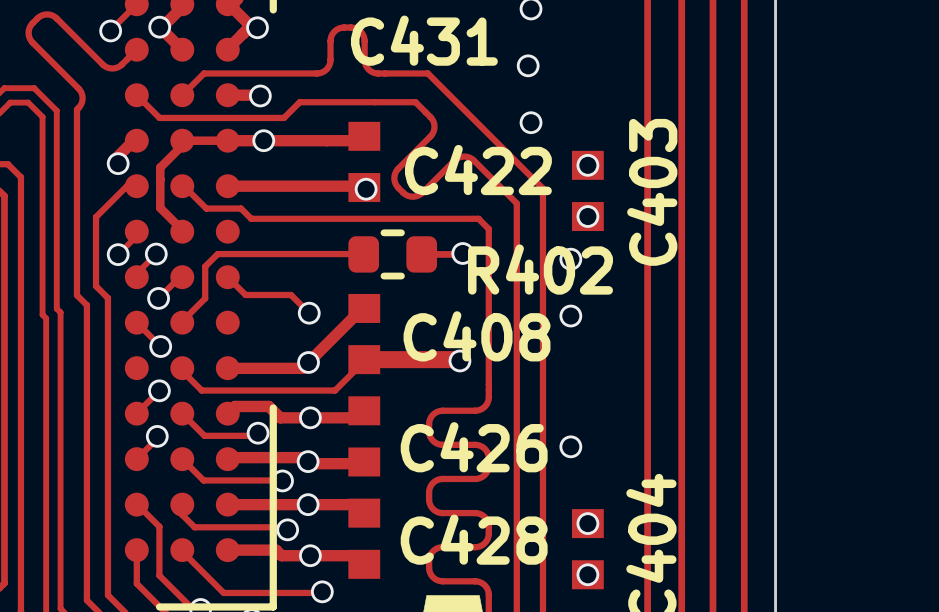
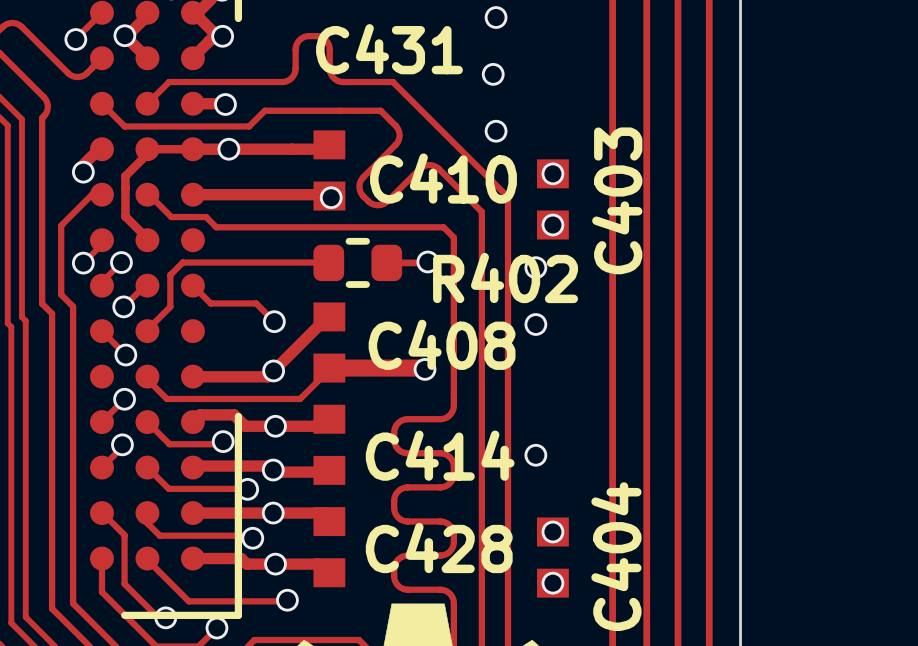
C422 name: C422 (478, 170) -> C410 (443, 178)
C426 name: C426 (474, 447) -> C414 (440, 455)

